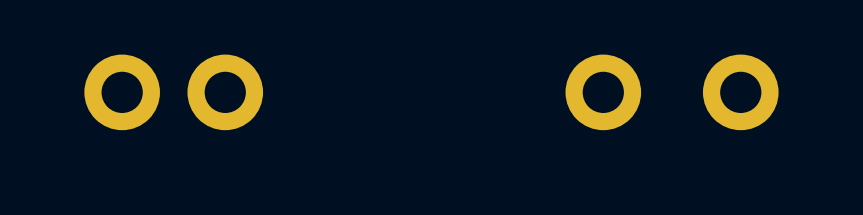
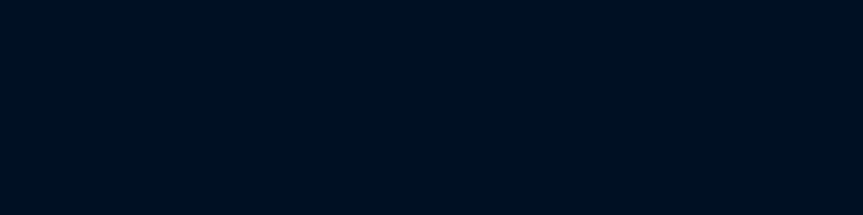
part: (122, 92) -> none
part: (225, 92) -> none
part: (603, 92) -> none
part: (740, 92) -> none

